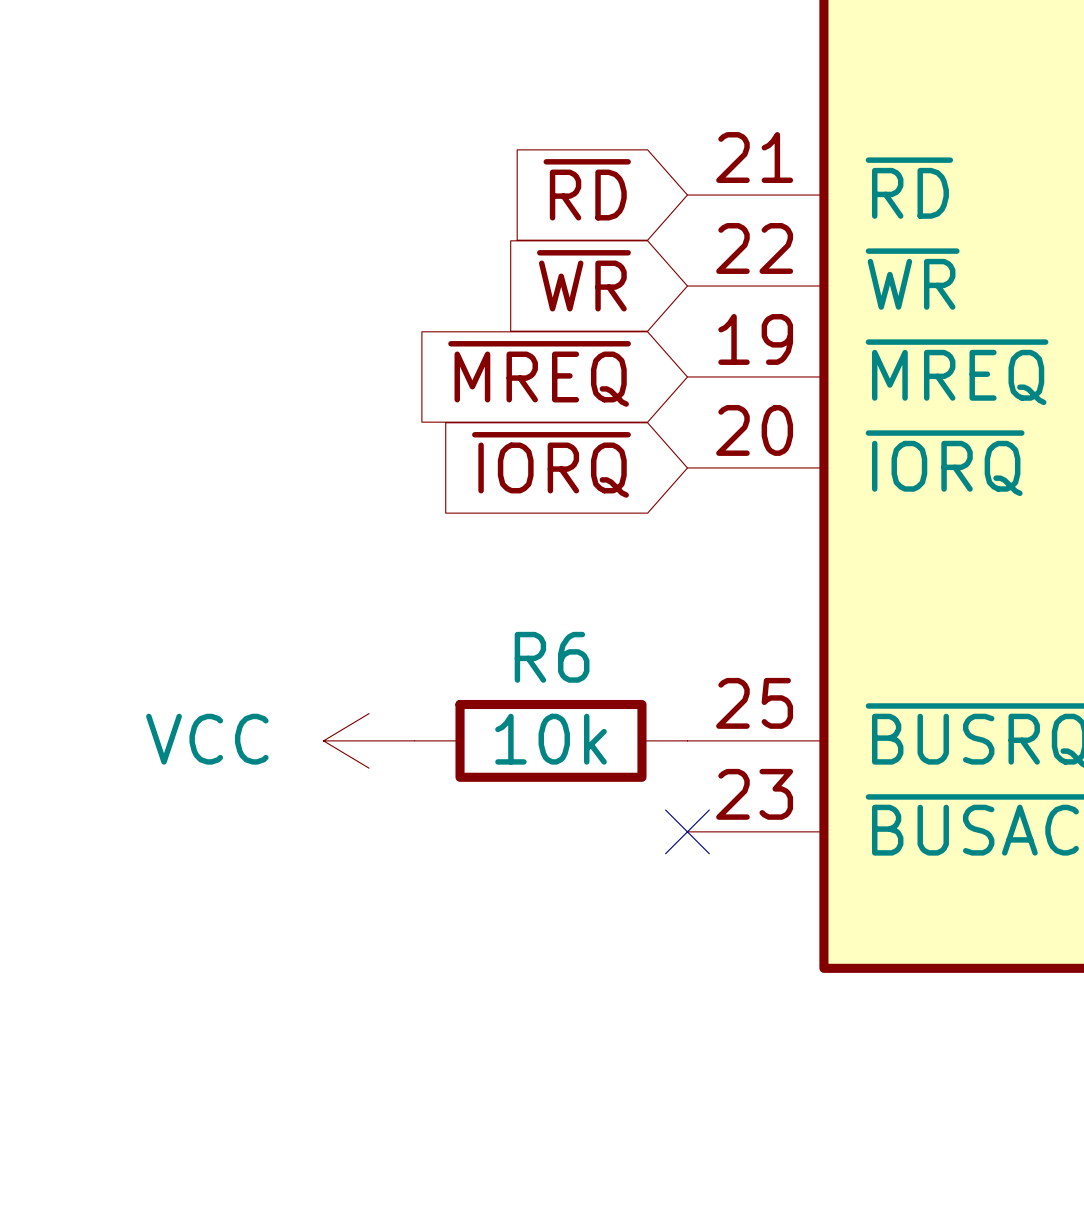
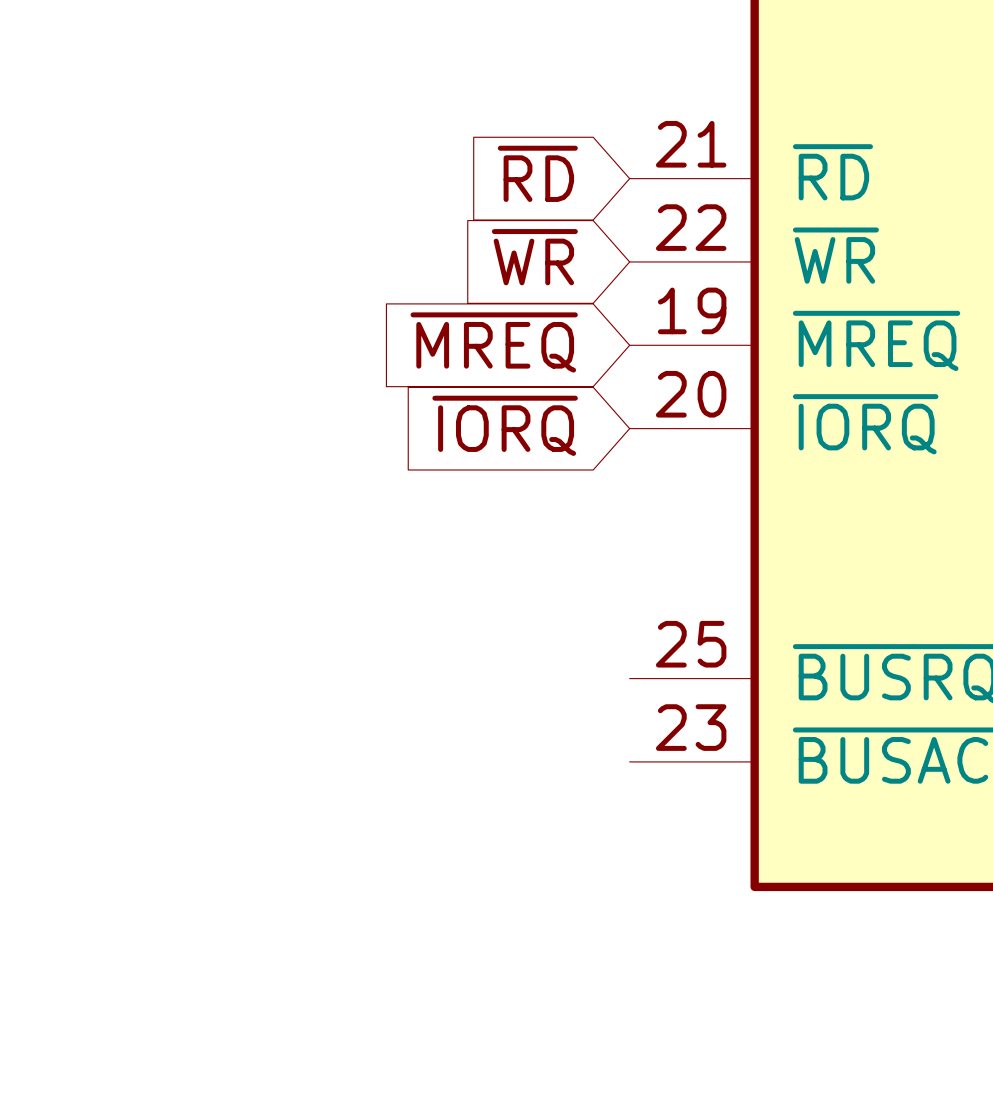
power symbol: VCC (369, 740) -> none
R6: 10k (551, 740) -> none
no-connect mark: (687, 831) -> none

